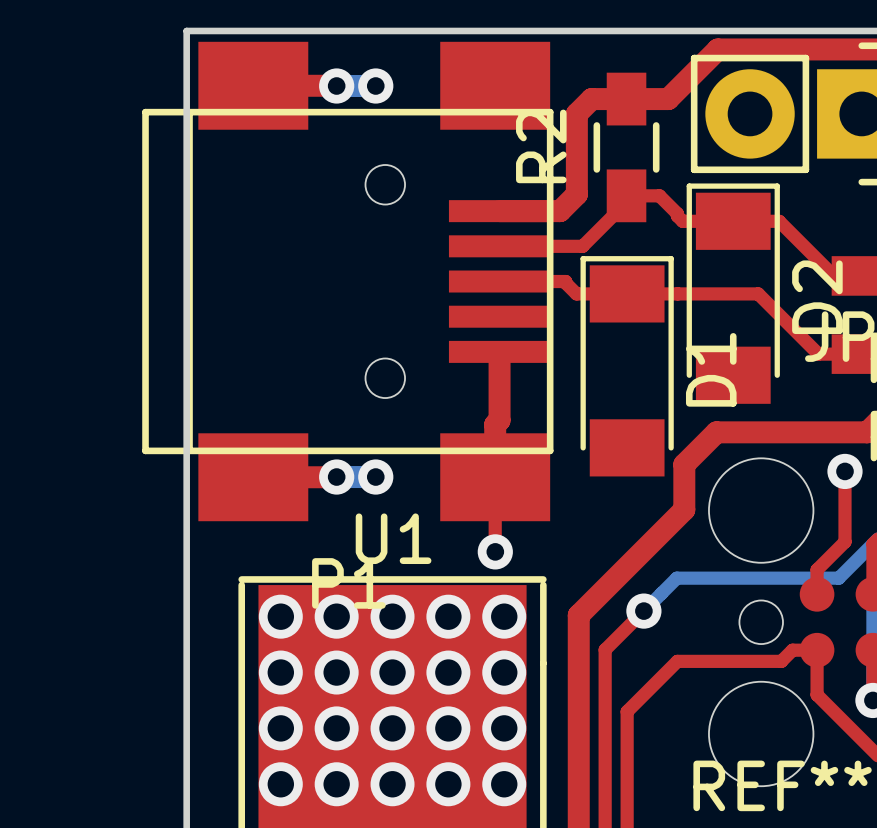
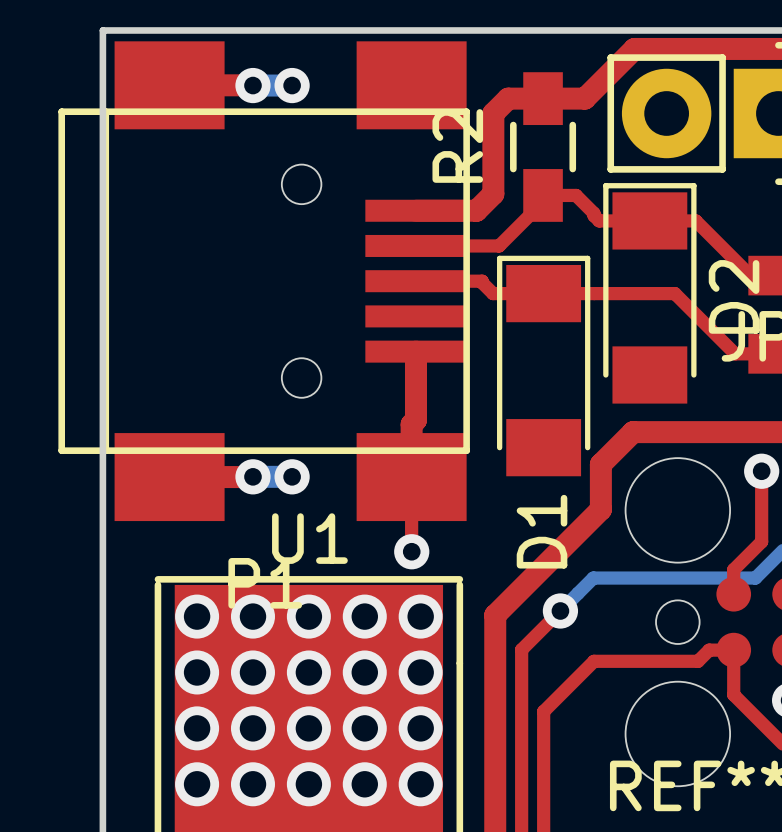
D1 name position: D1 (711, 369) -> D1 (542, 531)

